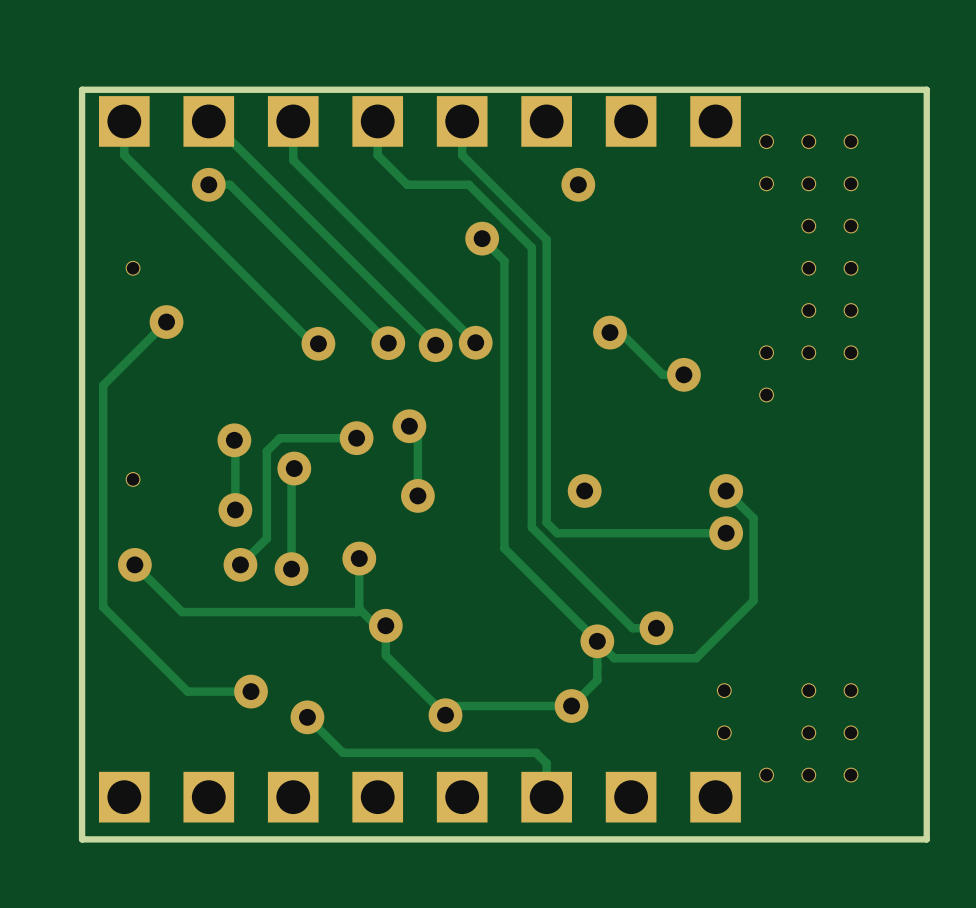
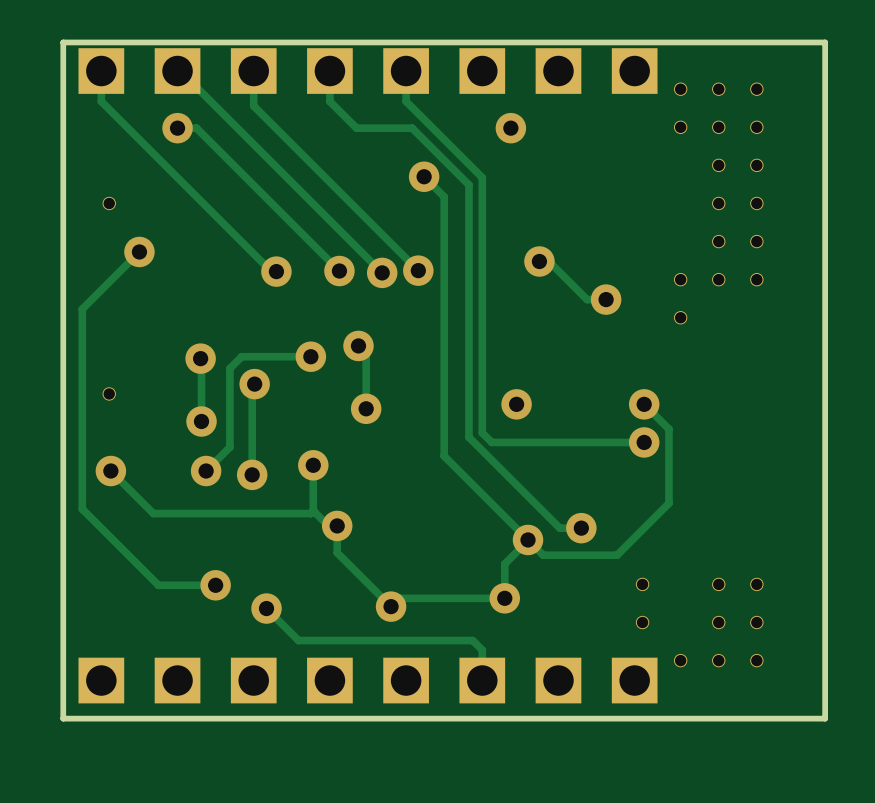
track: (597, 641) (597, 680) (571, 706) -> (528, 540) (504, 563) (504, 598)

